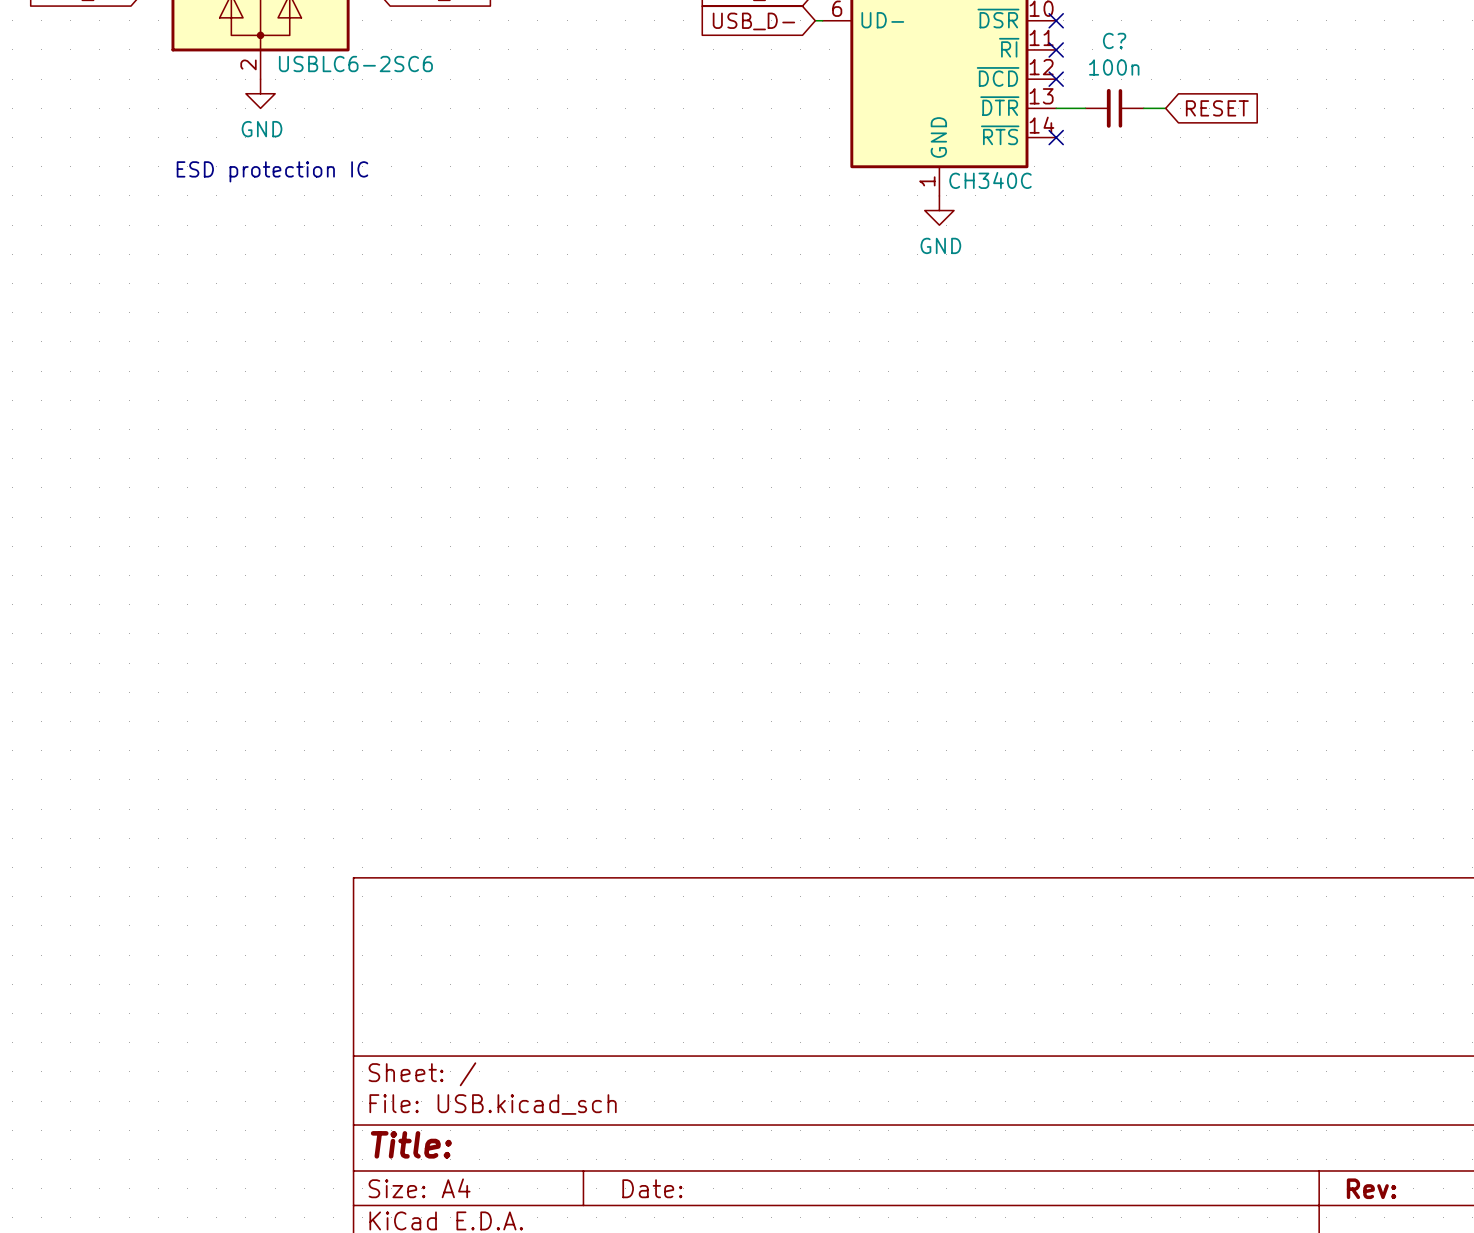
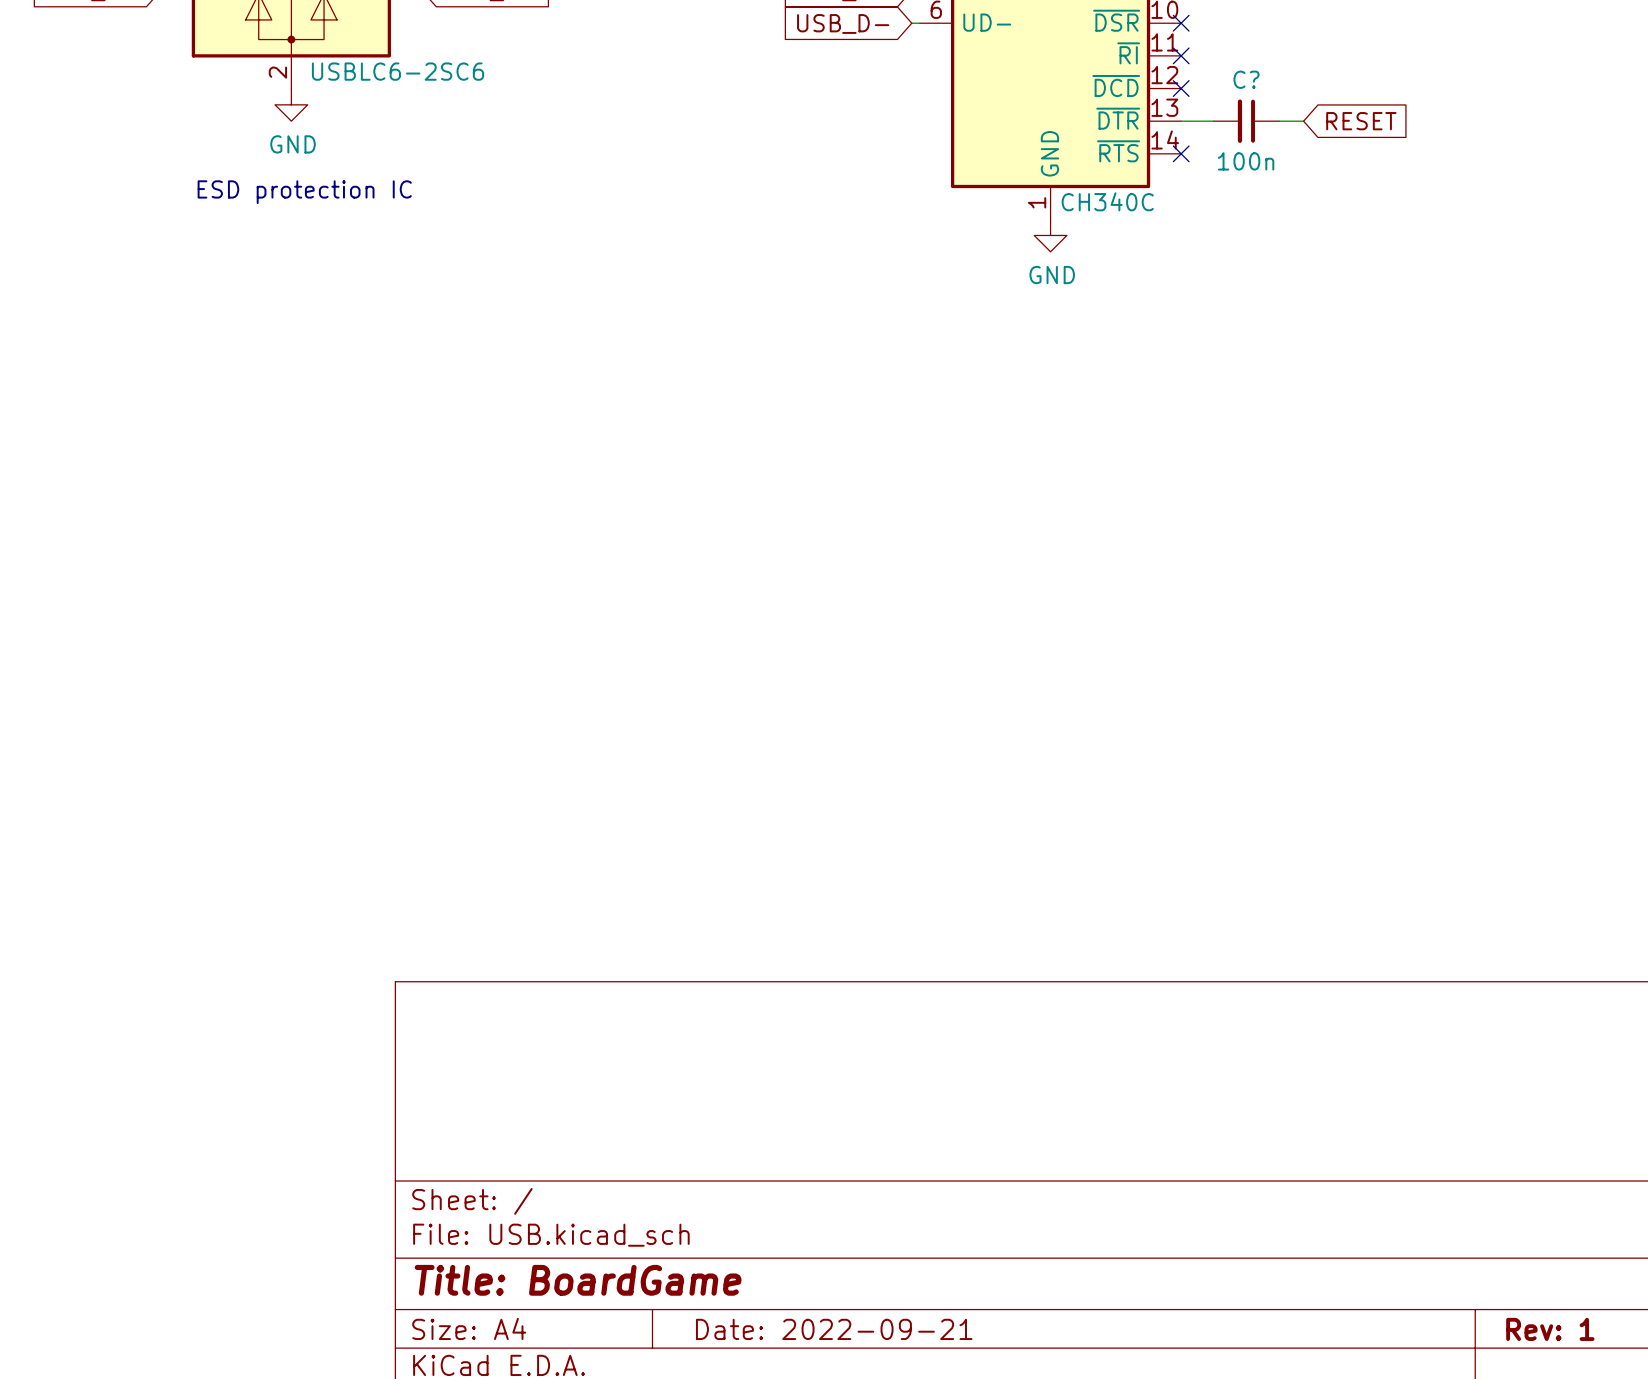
C? name position: C? (1114, 40) -> C? (1246, 79)
C? value position: 100n (1114, 67) -> 100n (1246, 161)
title block: Title: (411, 1144) -> Title: BoardGame (578, 1280)
title block: Date: (652, 1188) -> Date: 2022-09-21 (834, 1329)
title block: Rev: (1371, 1188) -> Rev: 1 (1550, 1329)

